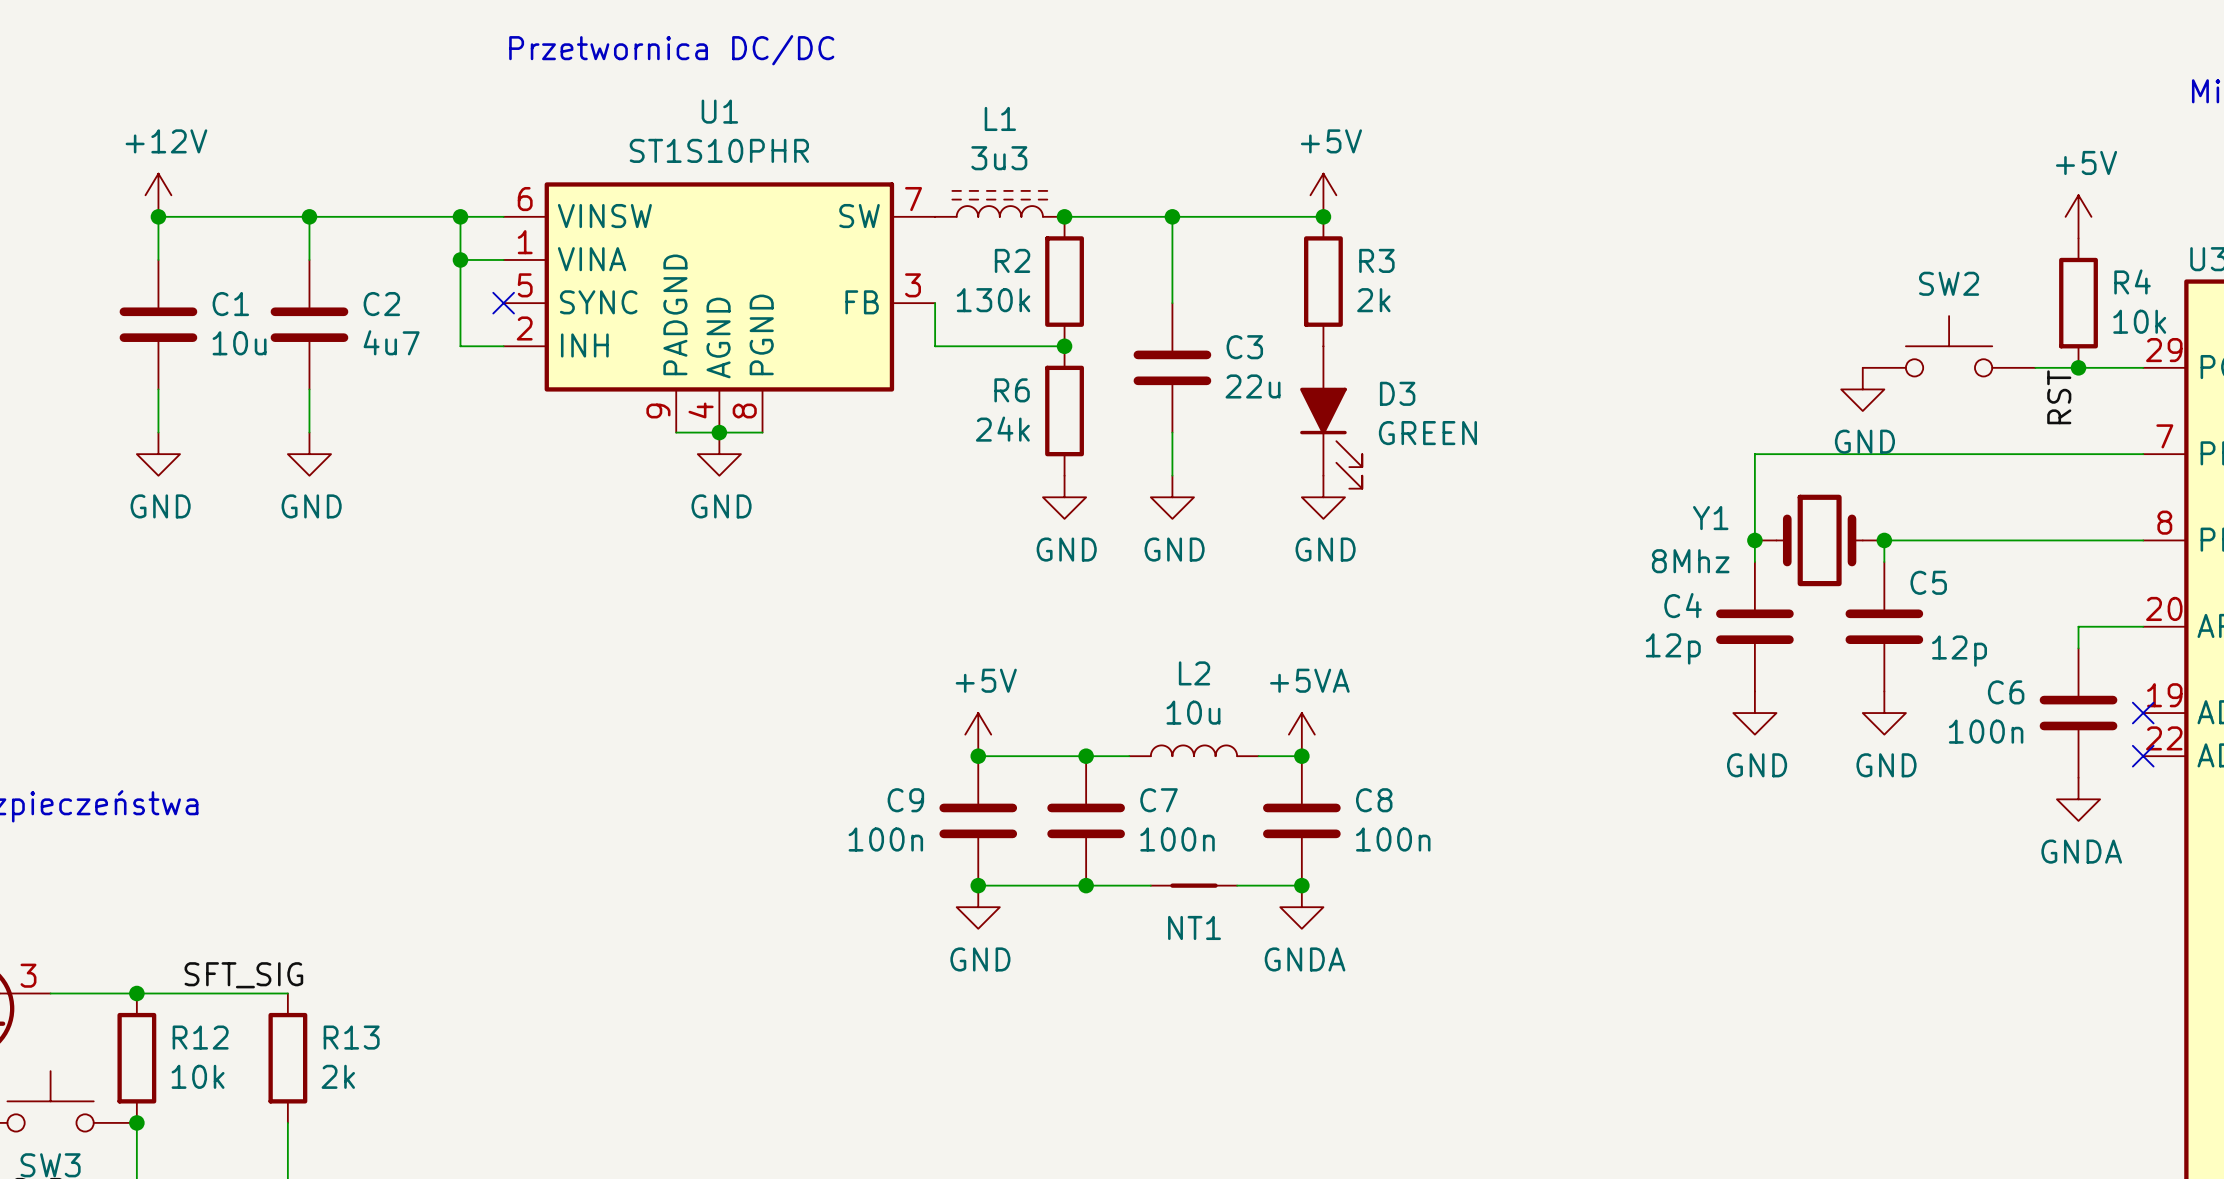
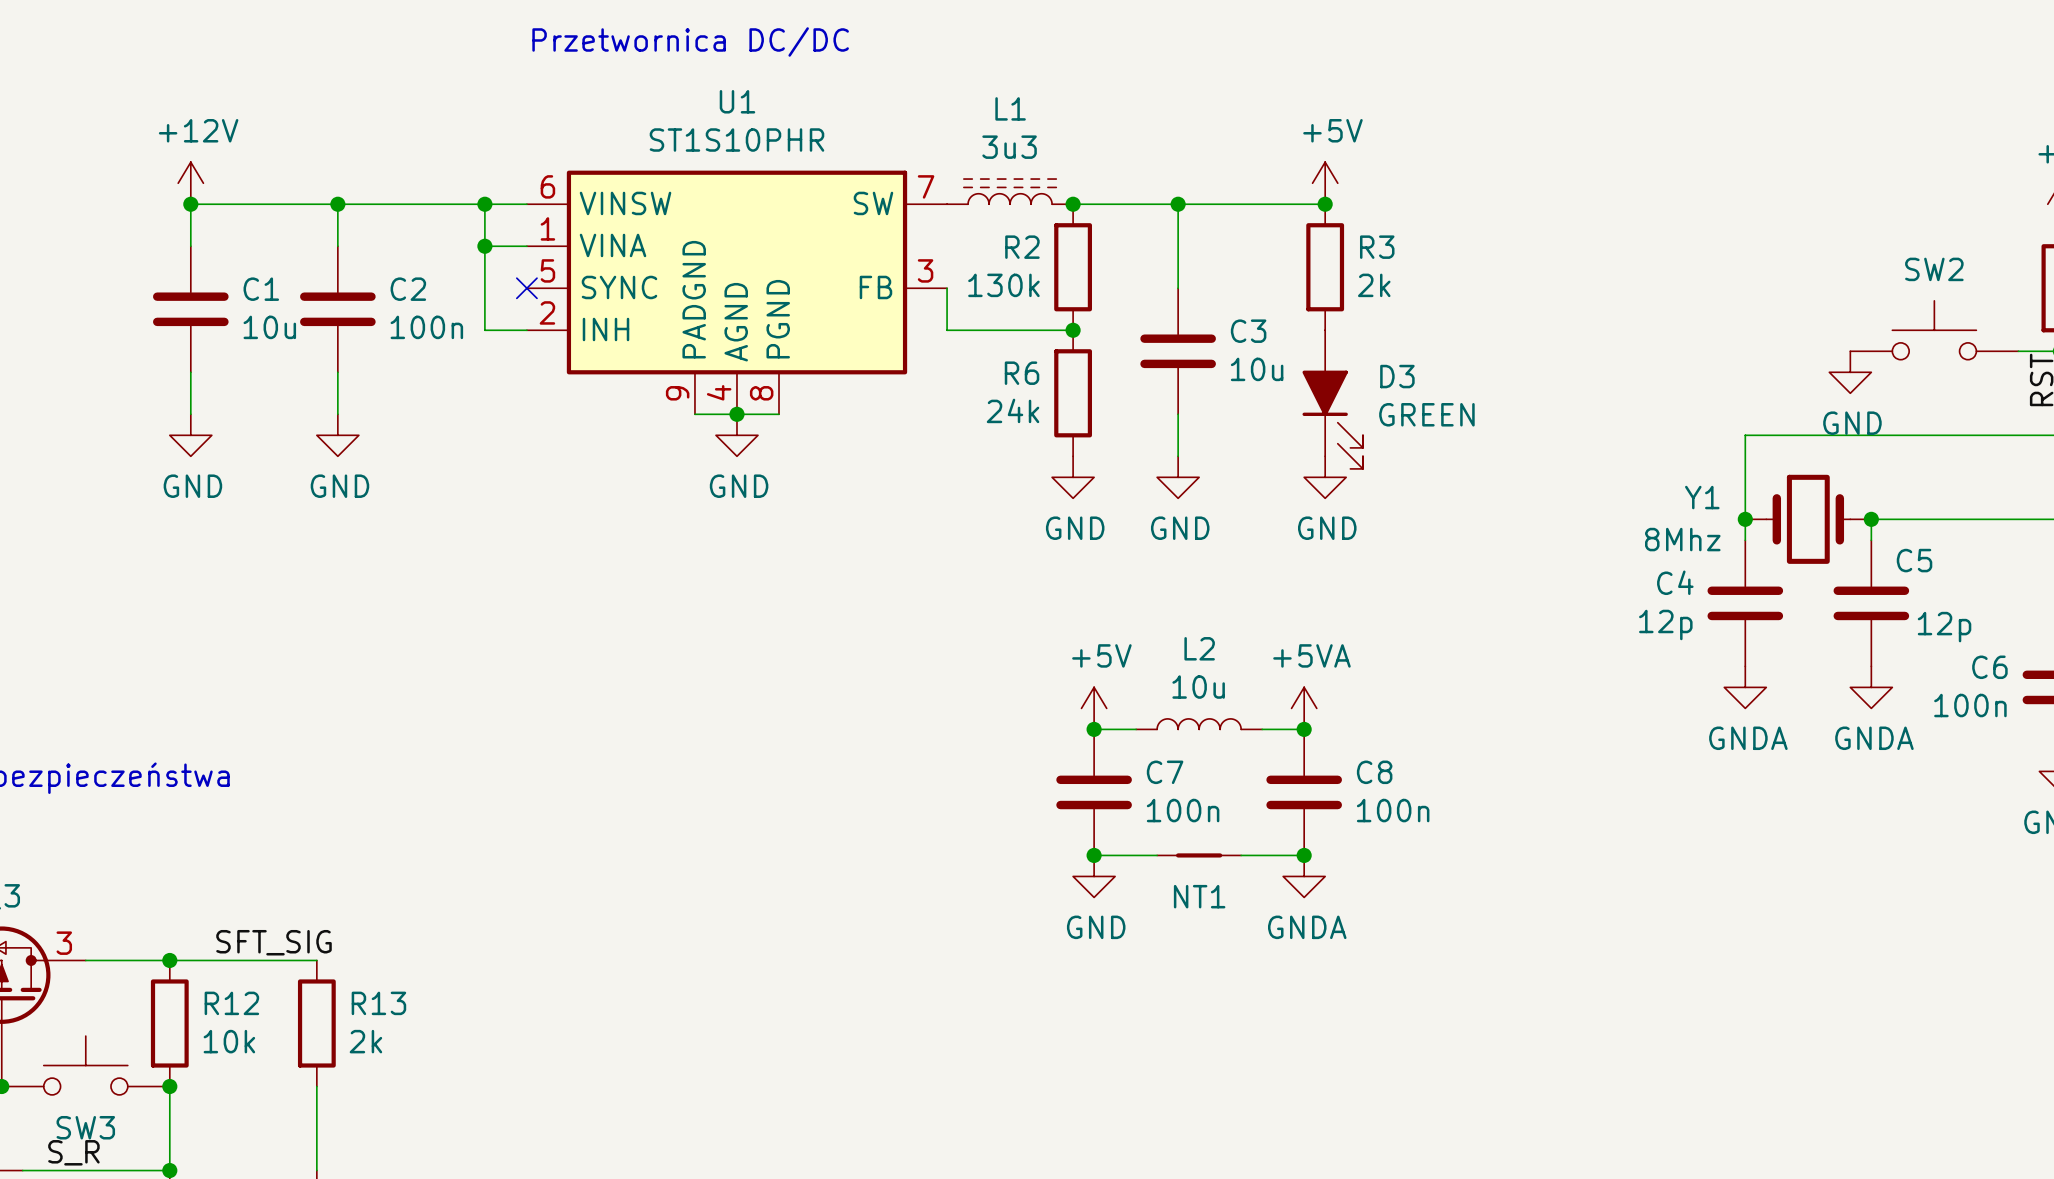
C2 value: 4u7 (391, 342) -> 100n (426, 327)
C3 value: 22u (1253, 386) -> 10u (1257, 369)
power symbol: GND (1754, 713) -> GNDA (1745, 687)
power symbol: GND (1884, 713) -> GNDA (1871, 687)
power symbol position: +5V (978, 734) -> +5V (1094, 708)
wire: (978, 756) (1086, 756) -> none
junction: (978, 756) -> none
C9: 100n (978, 820) -> none
wire: (978, 885) (1086, 885) -> none
junction: (978, 885) -> none
power symbol position: GND (978, 907) -> GND (1094, 876)

